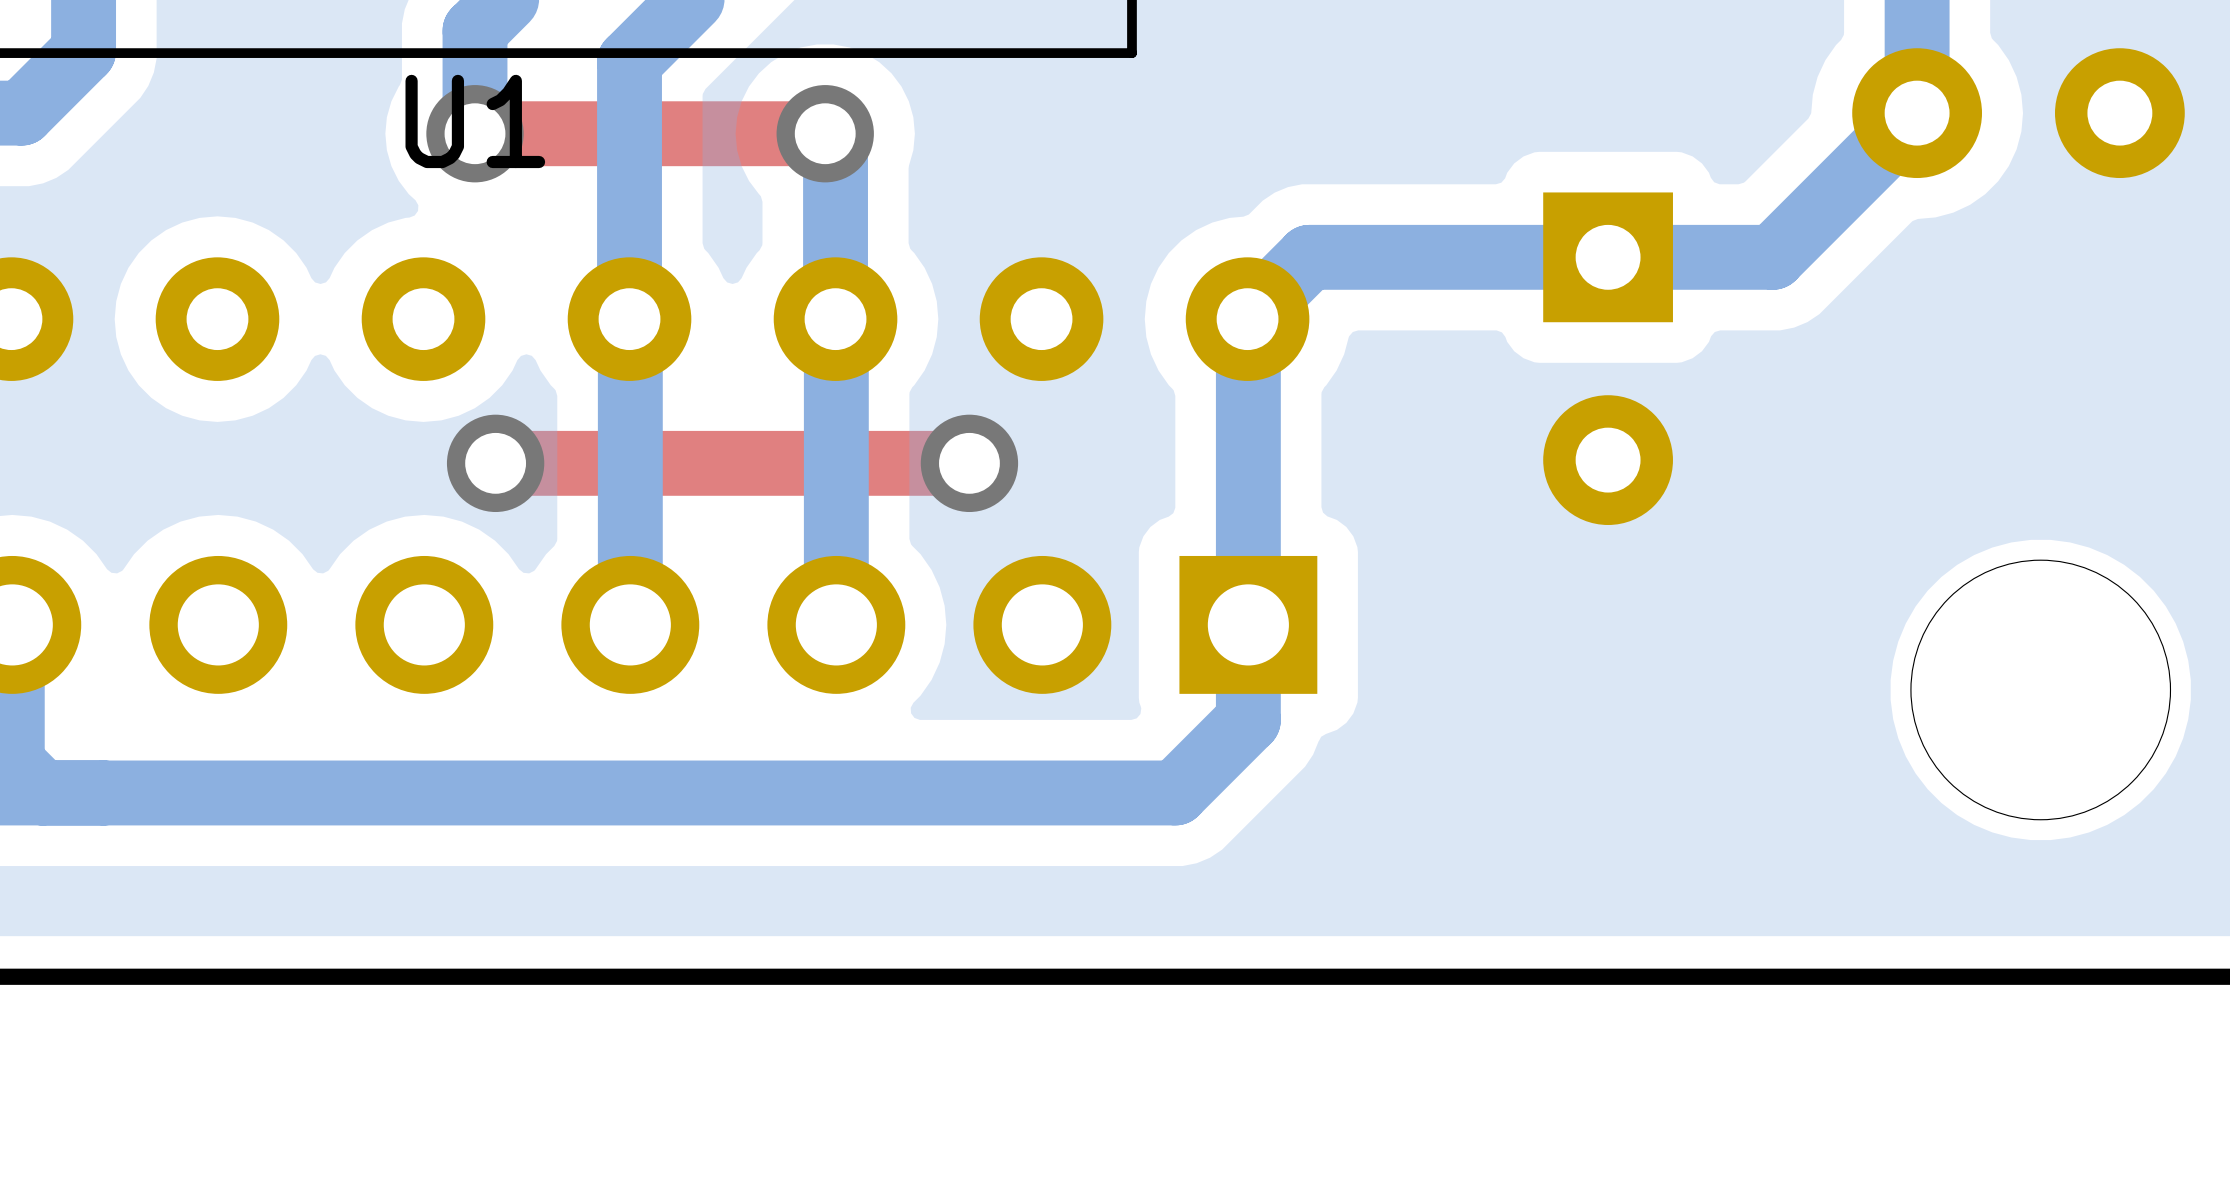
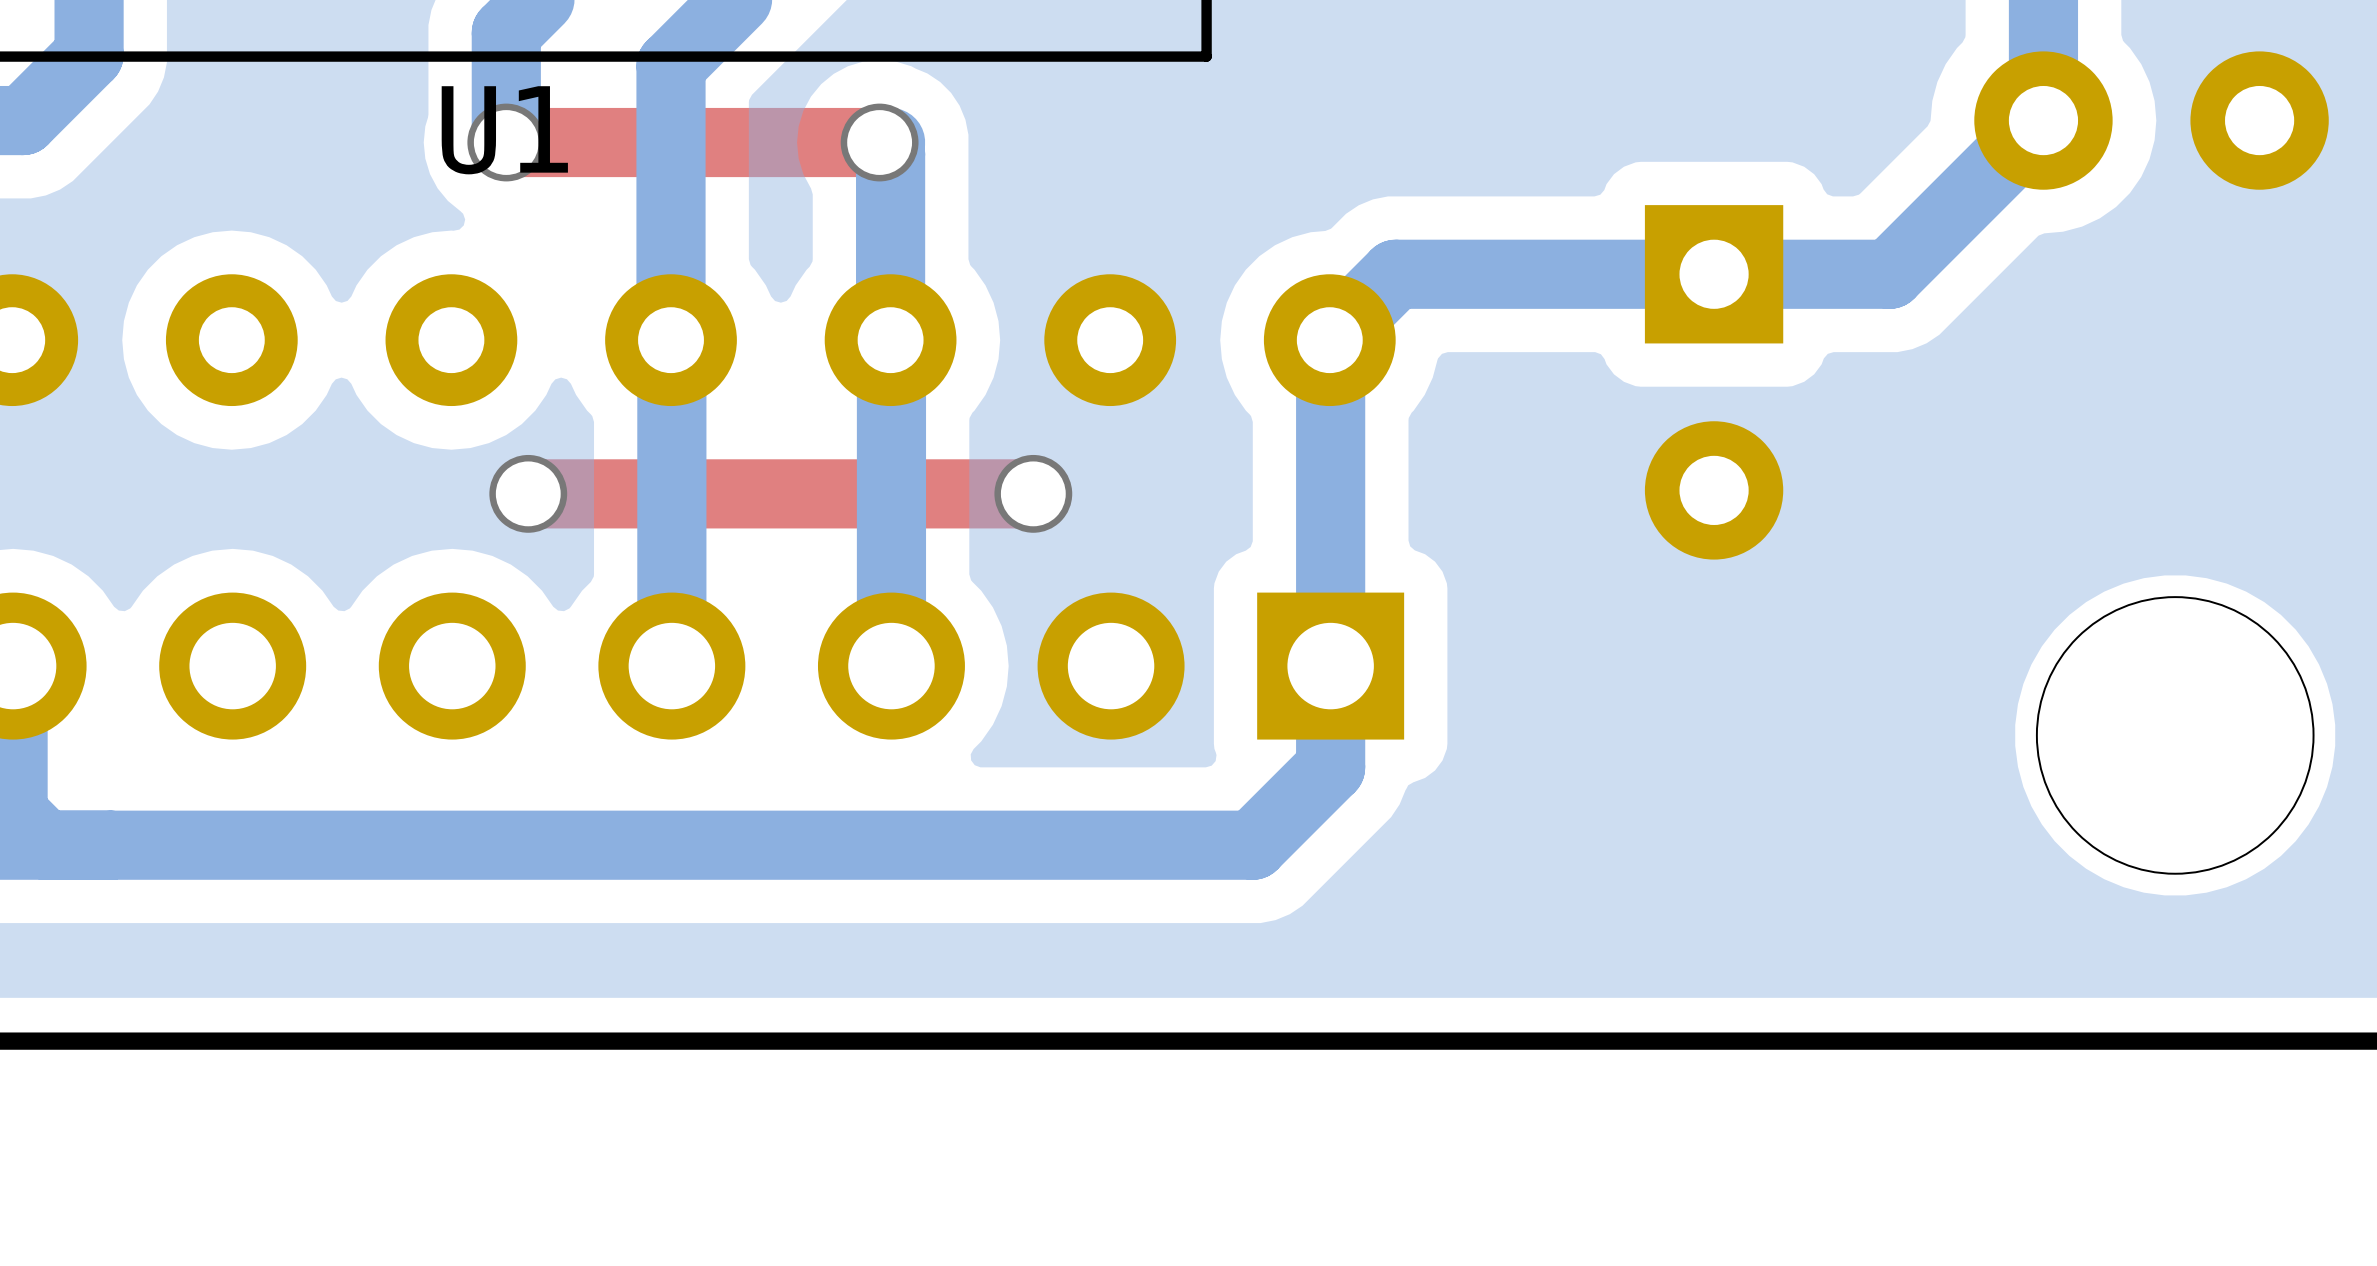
via size: [426, 85, 524, 183] -> [467, 103, 546, 182]
via size: [776, 85, 874, 183] -> [840, 103, 919, 182]
via size: [446, 414, 545, 513] -> [489, 454, 568, 533]
via size: [920, 414, 1019, 513] -> [994, 454, 1073, 533]

